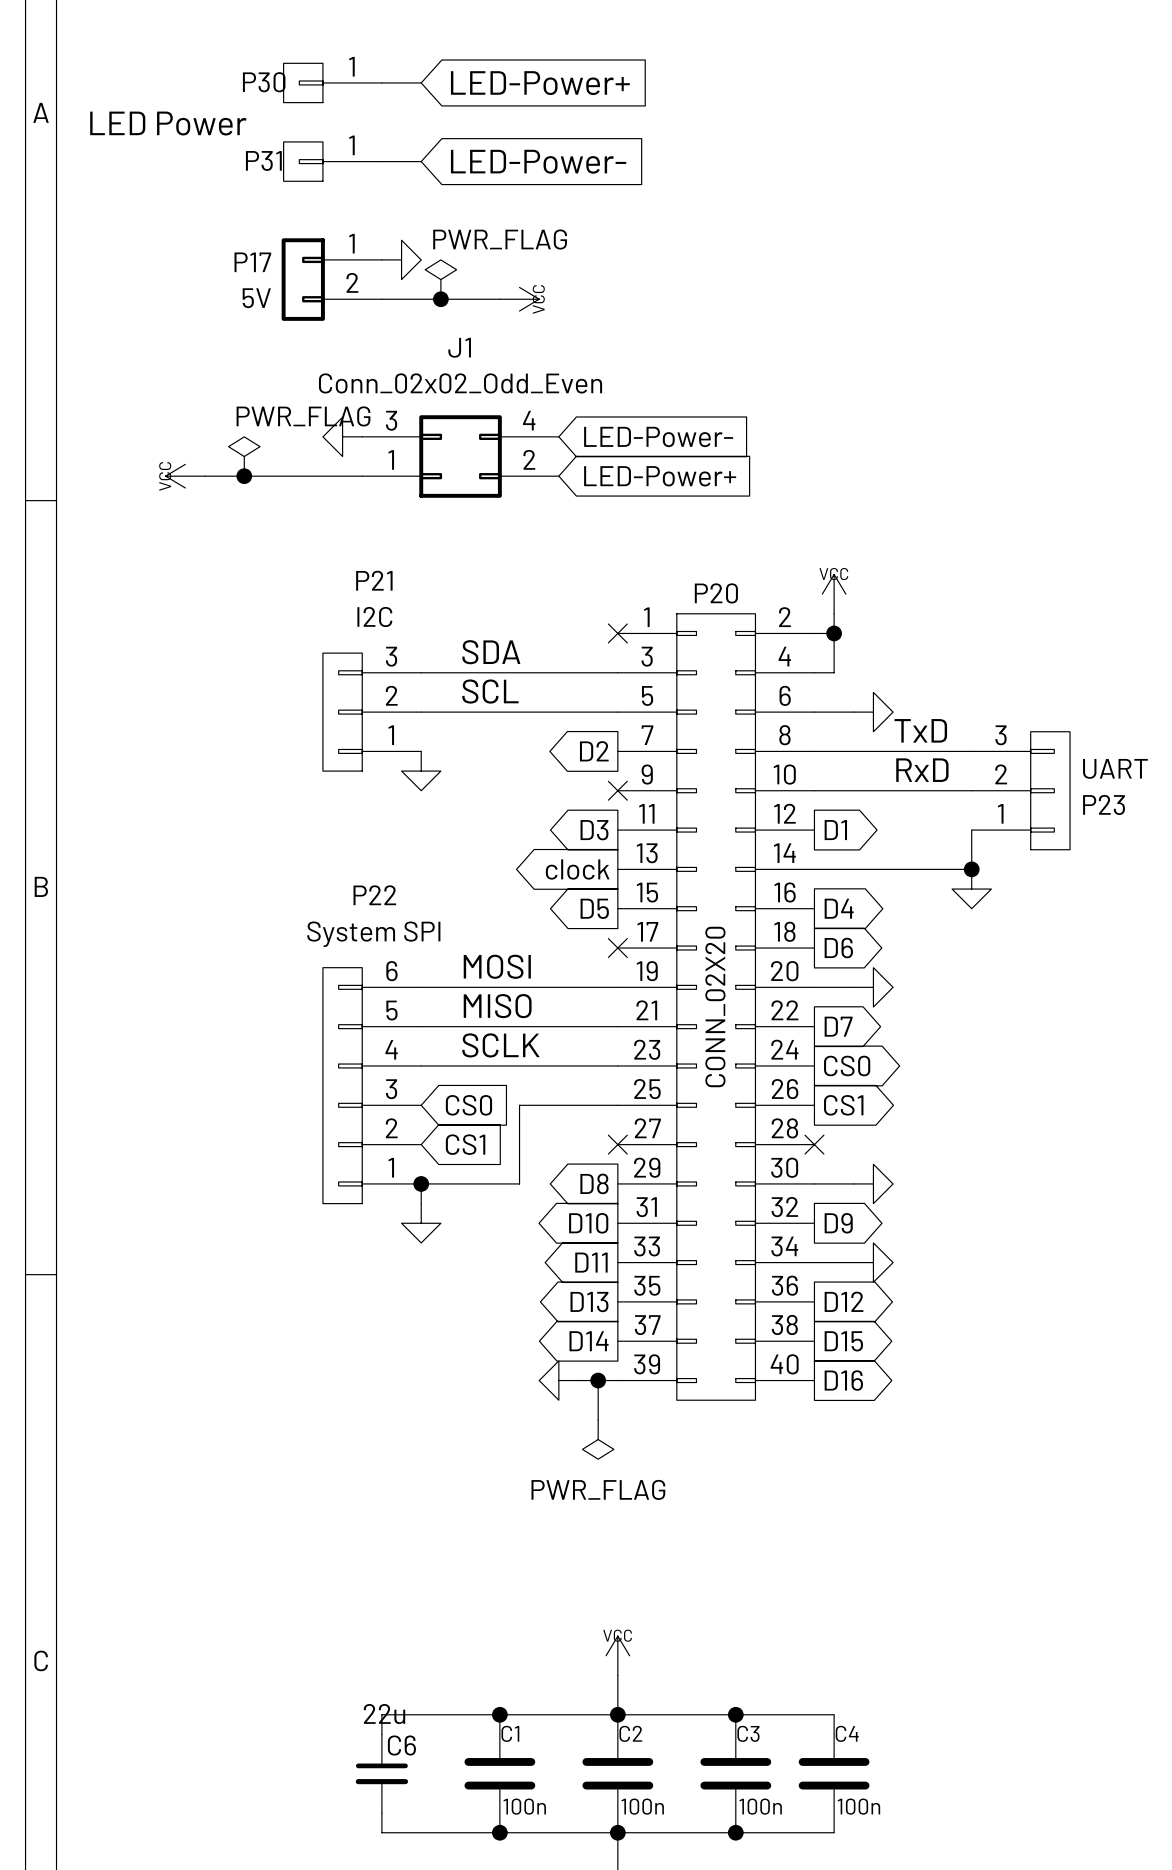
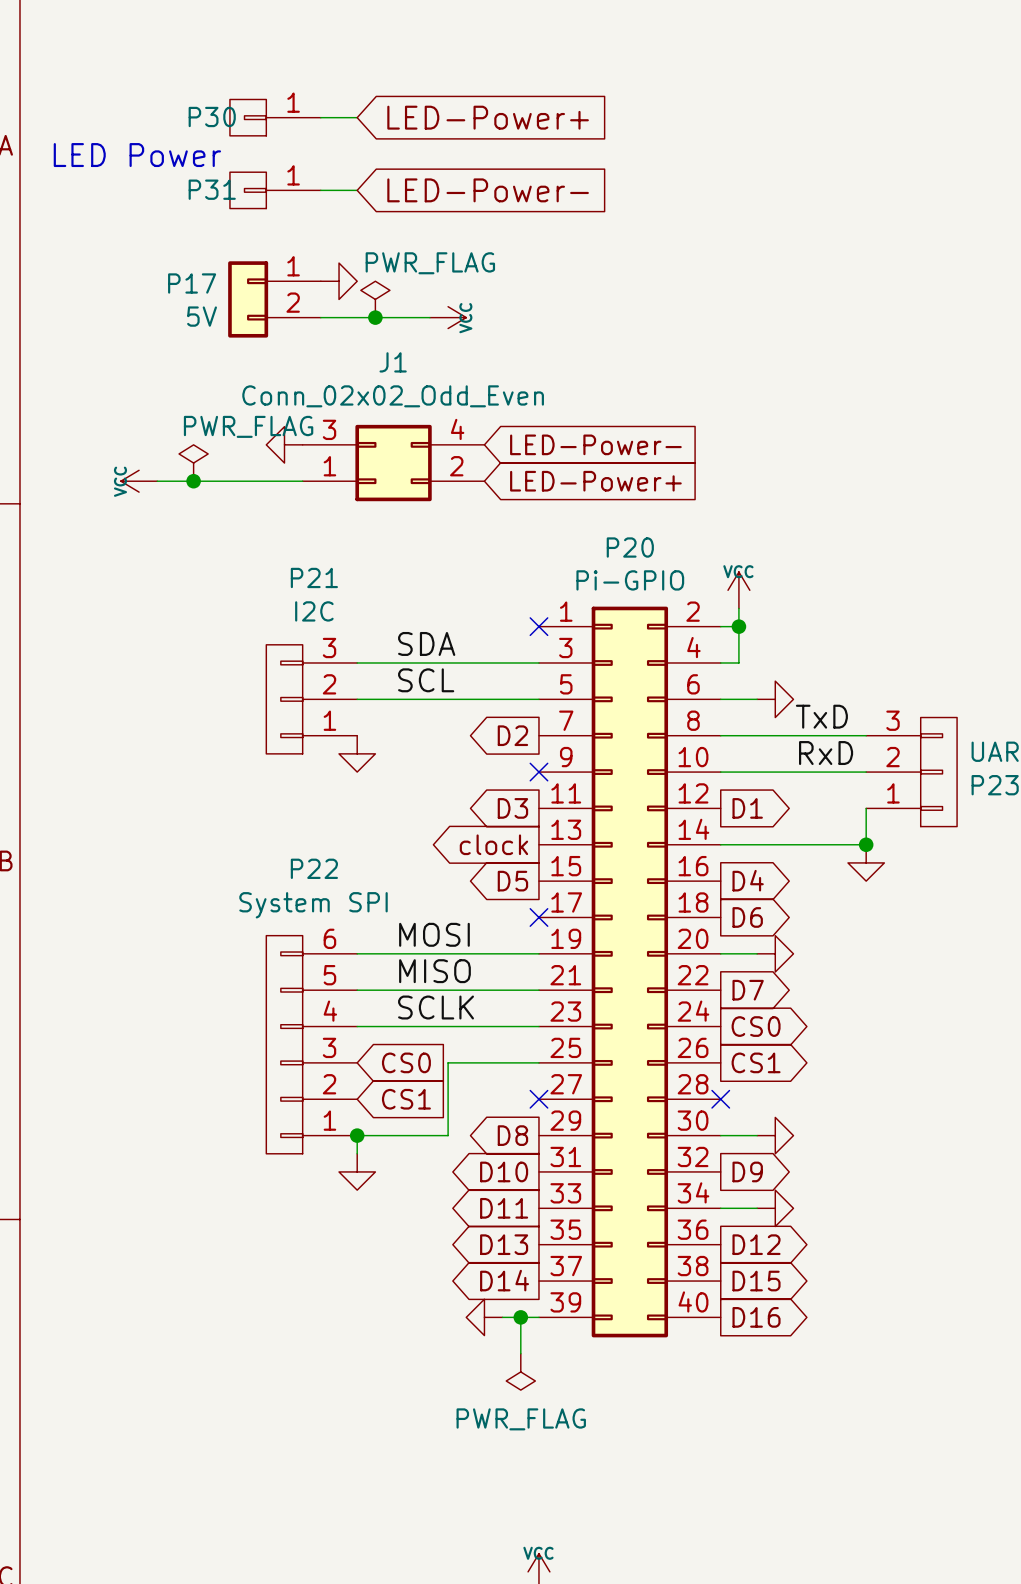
P20 name position: P20 (716, 593) -> P20 (630, 547)
P20 symbol: [617, 613, 815, 1401] -> [538, 606, 721, 1338]
P20 value: CONN_02X20 (715, 1006) -> Pi-GPIO (630, 580)

